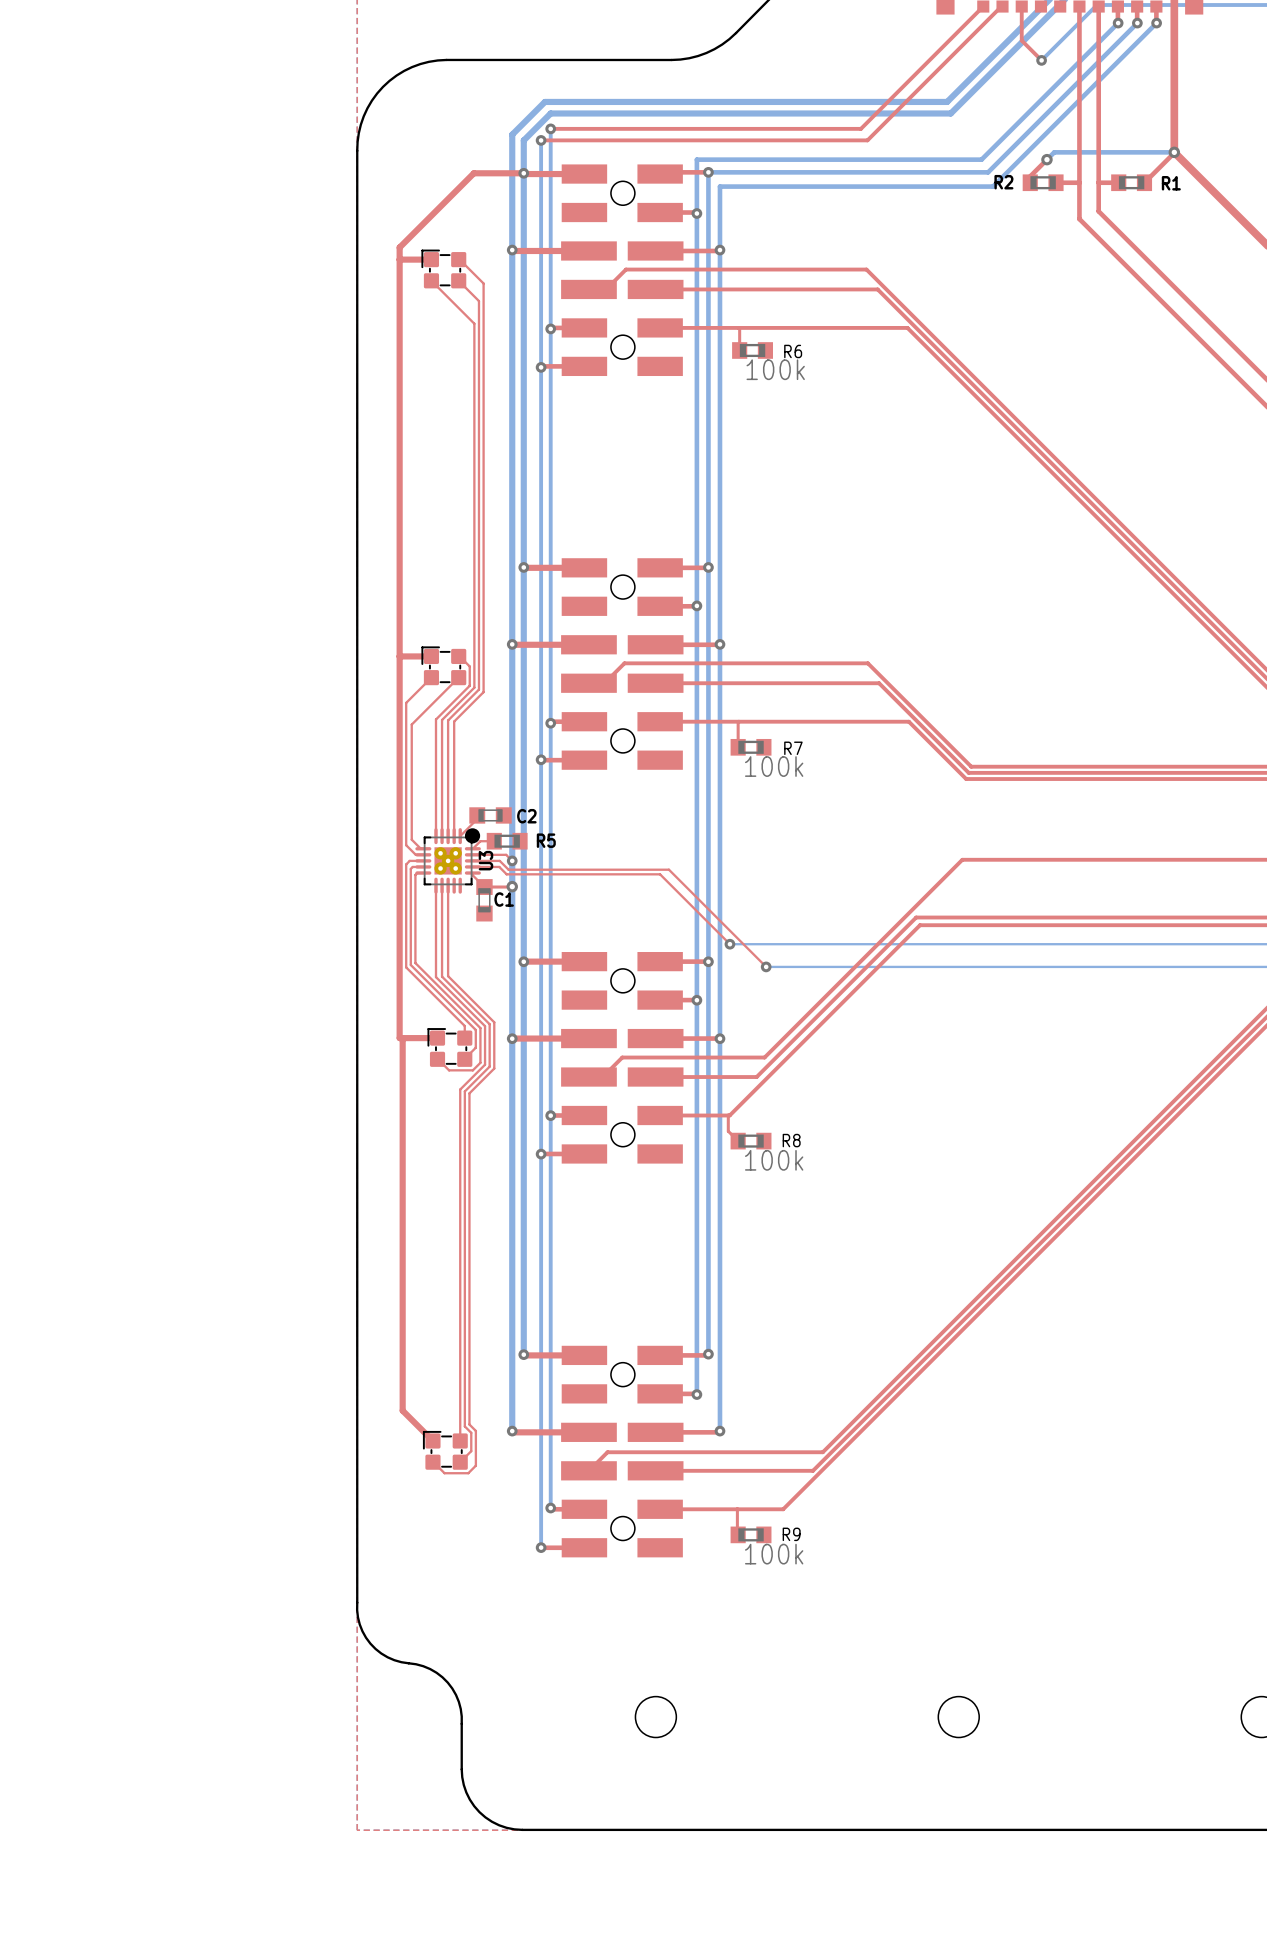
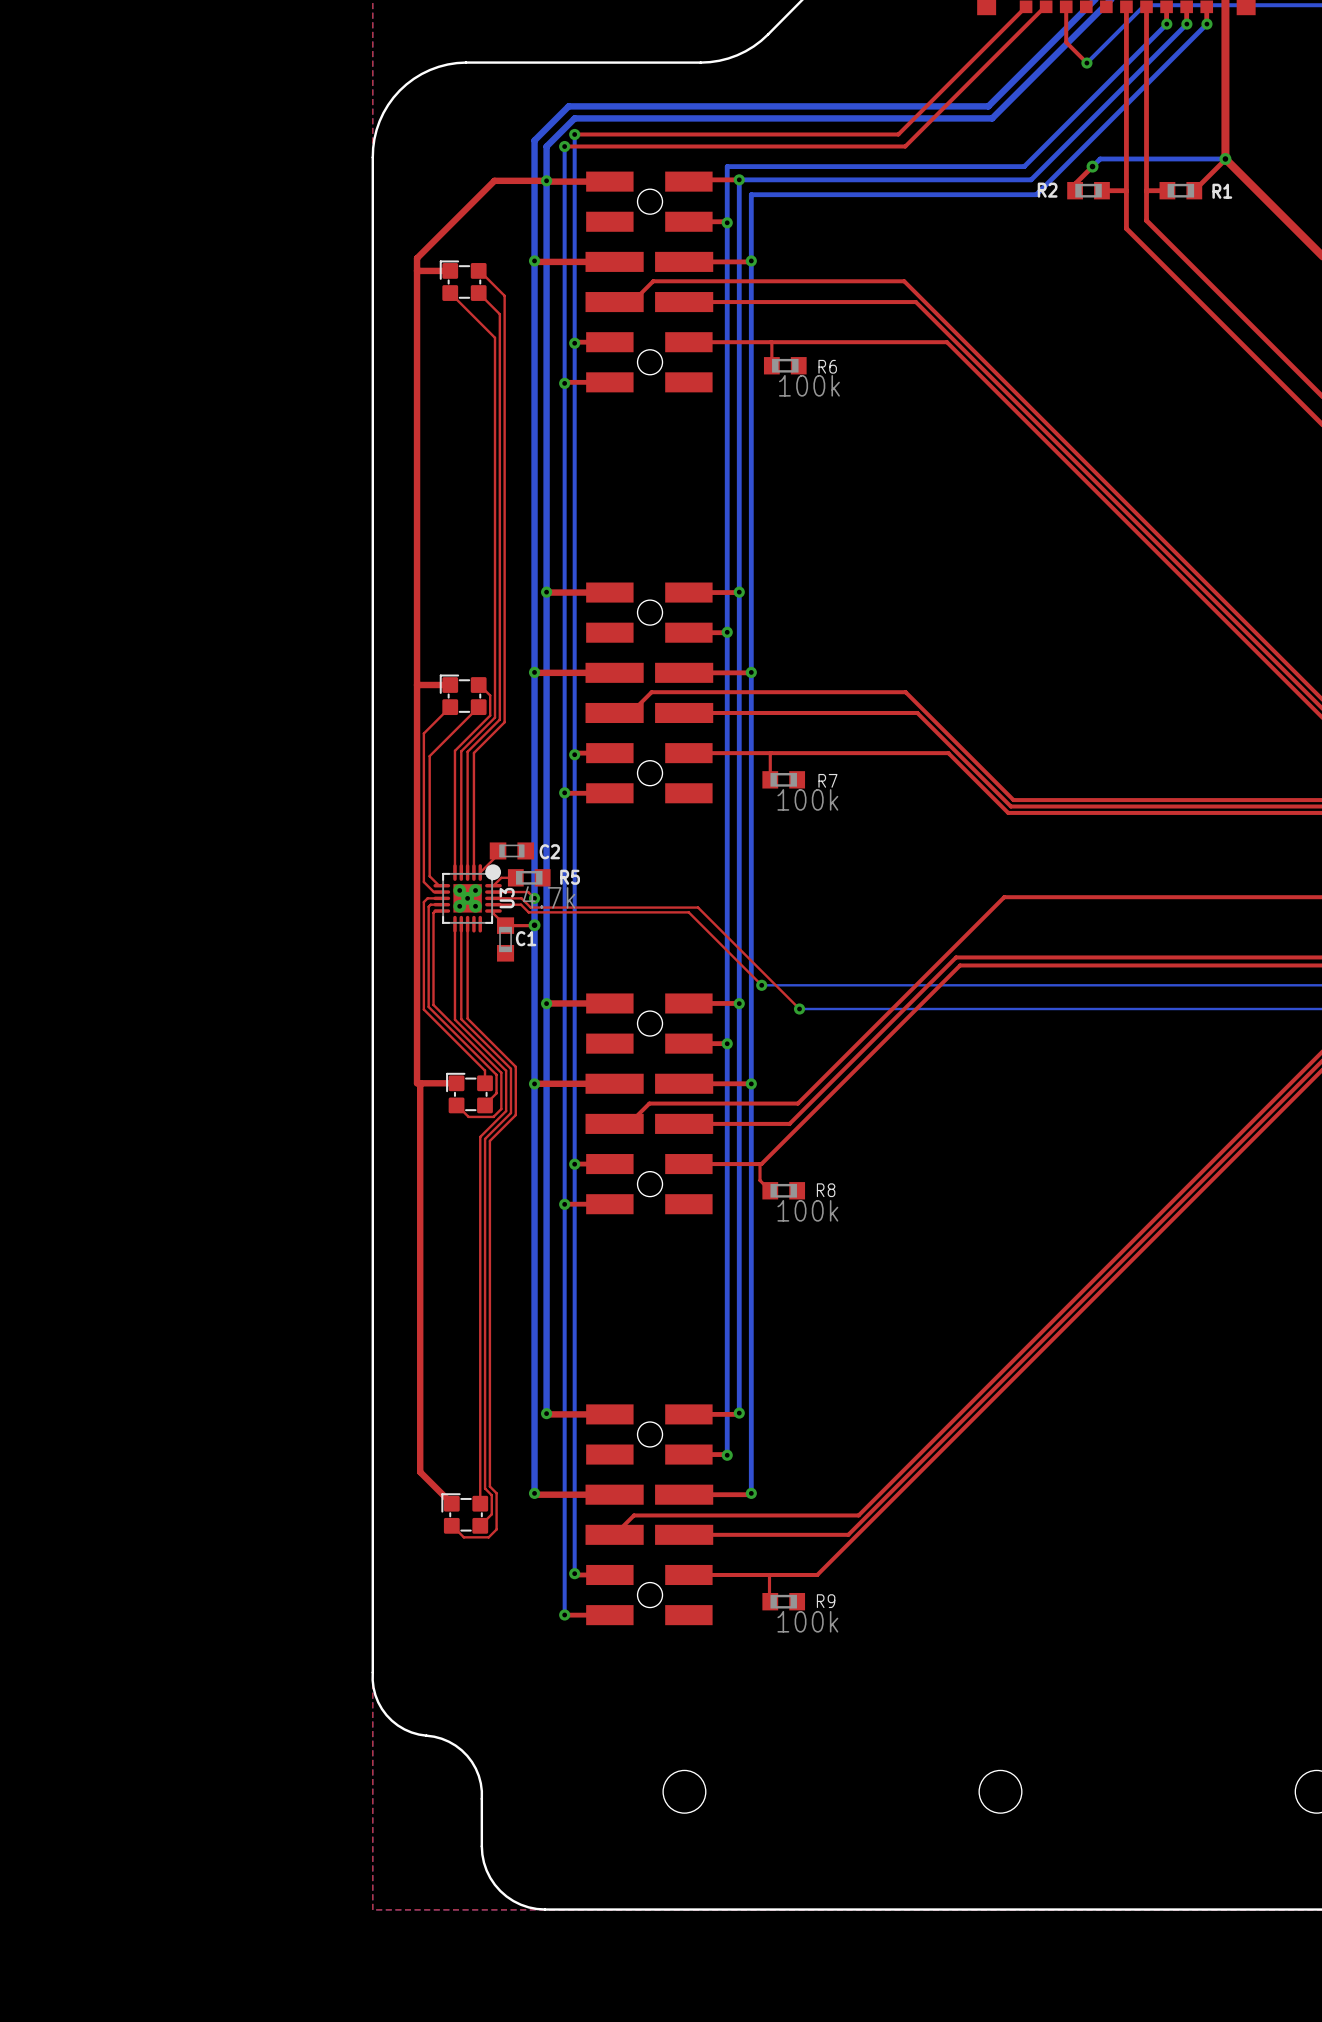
R5 value: none -> 4.7k (549, 897)

